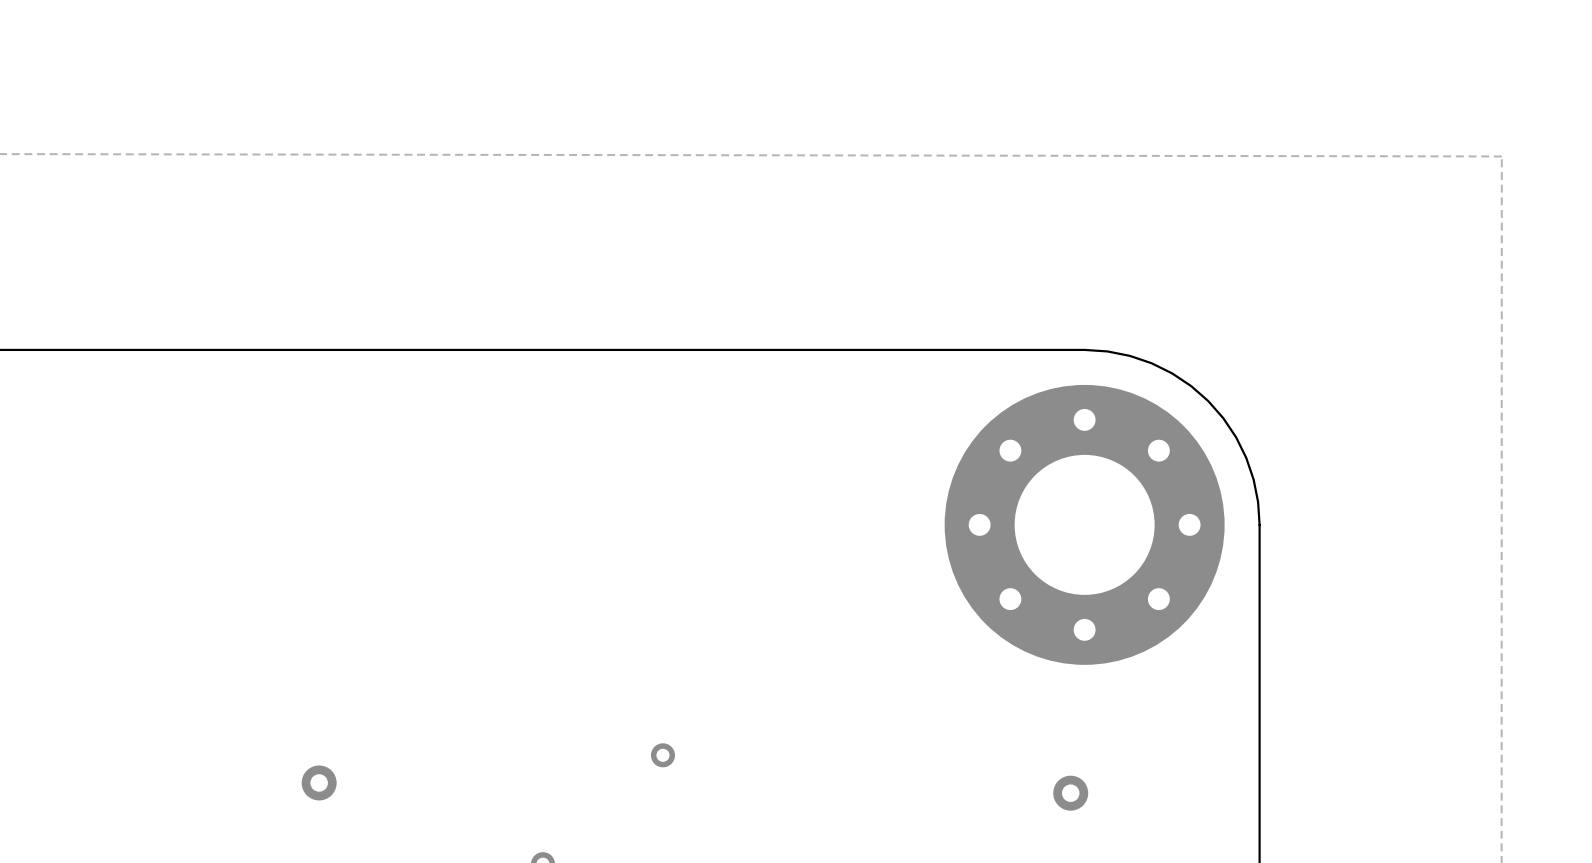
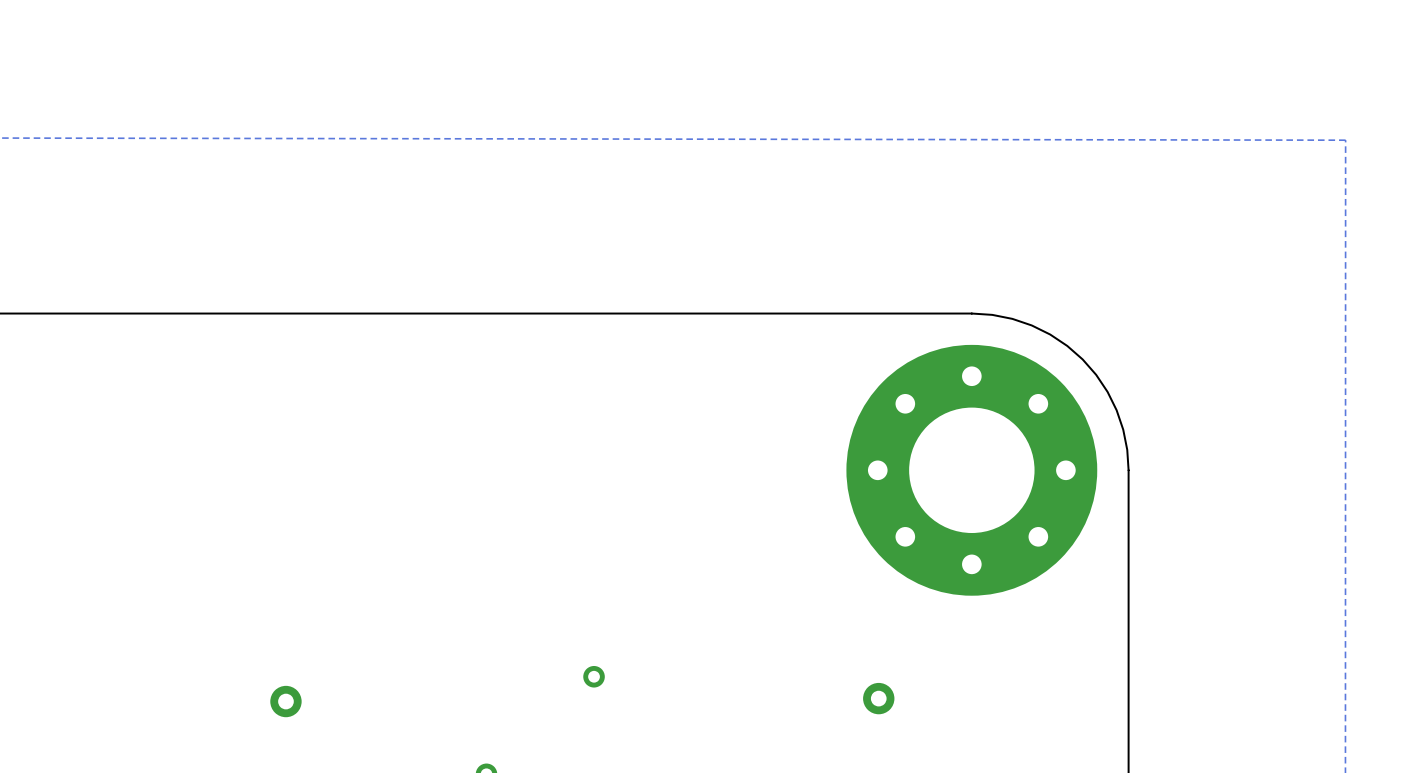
via position: (1070, 793) -> (878, 698)

